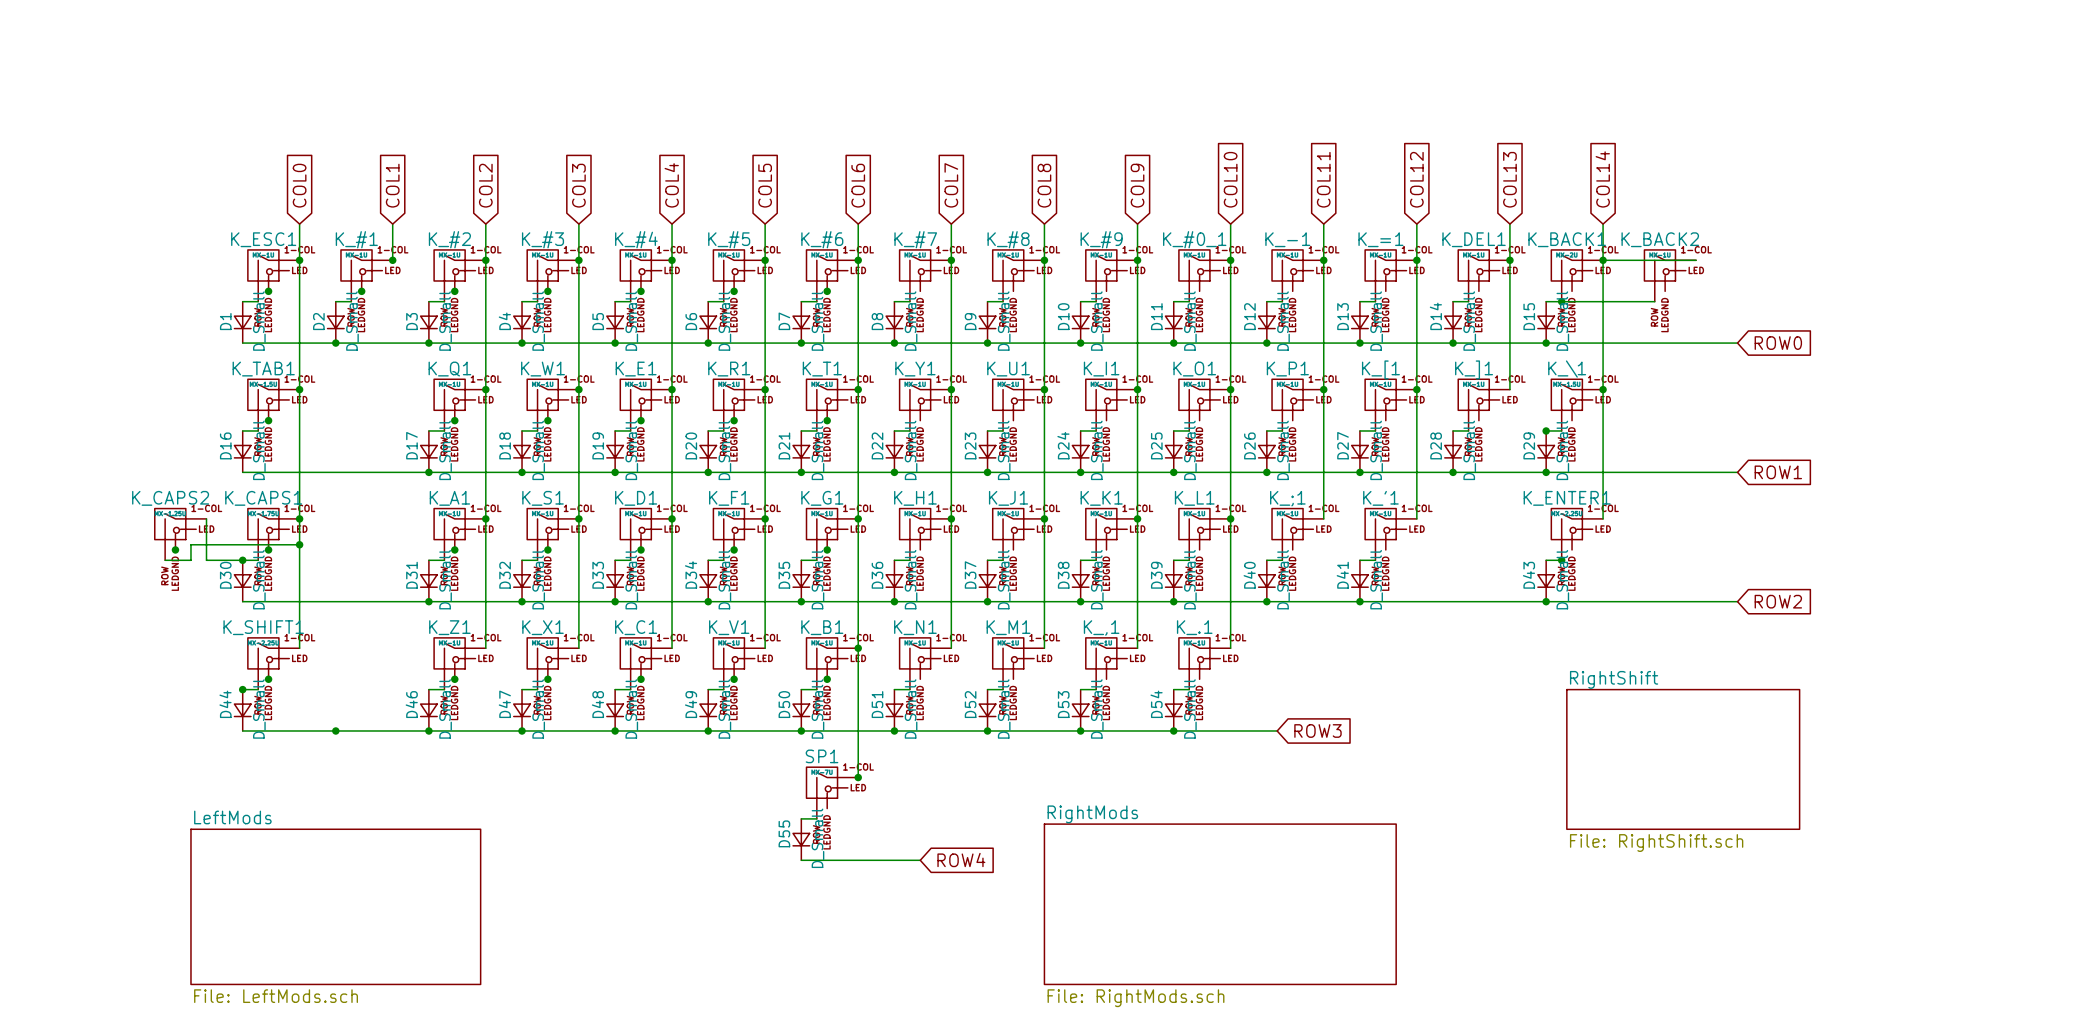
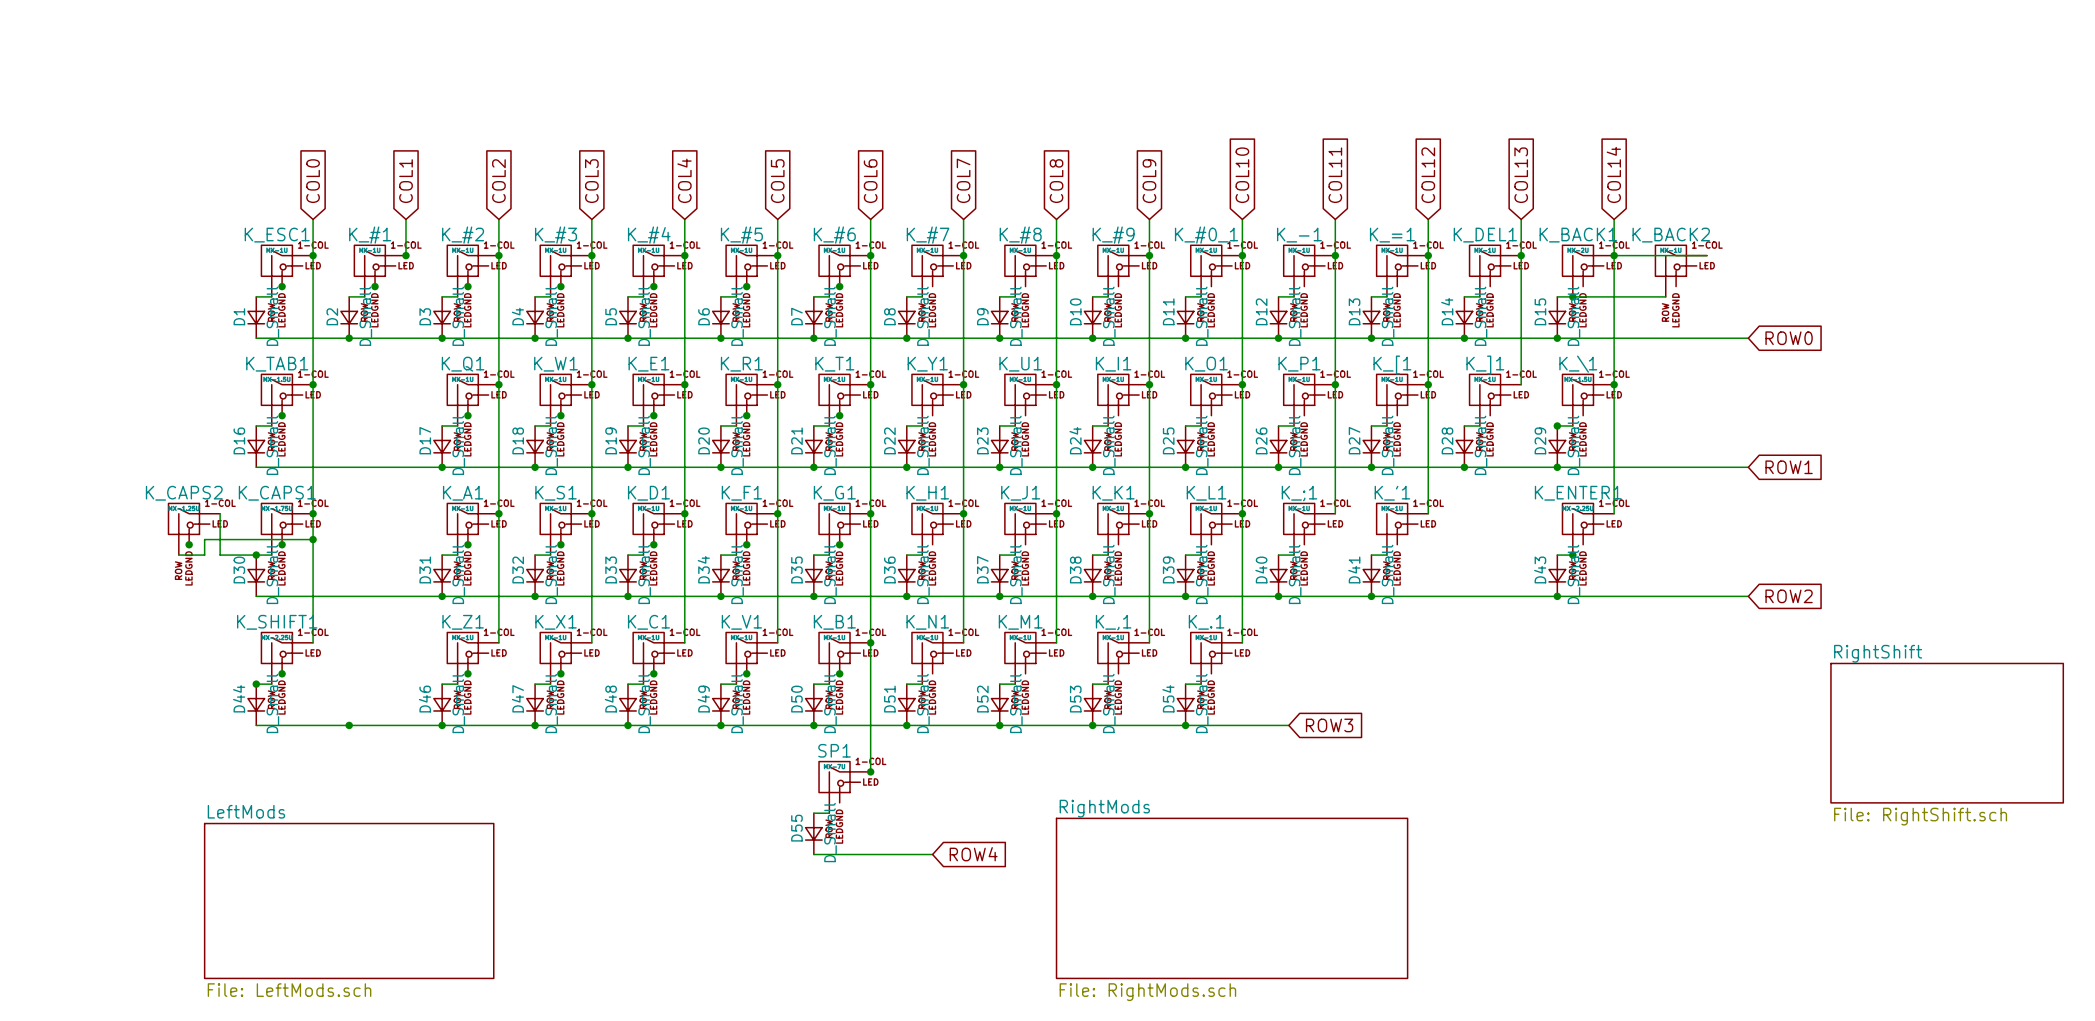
sheet RightShift: none -> File: RightShift.sch (1947, 733)
sheet RightShift: File: RightShift.sch (1683, 759) -> none

